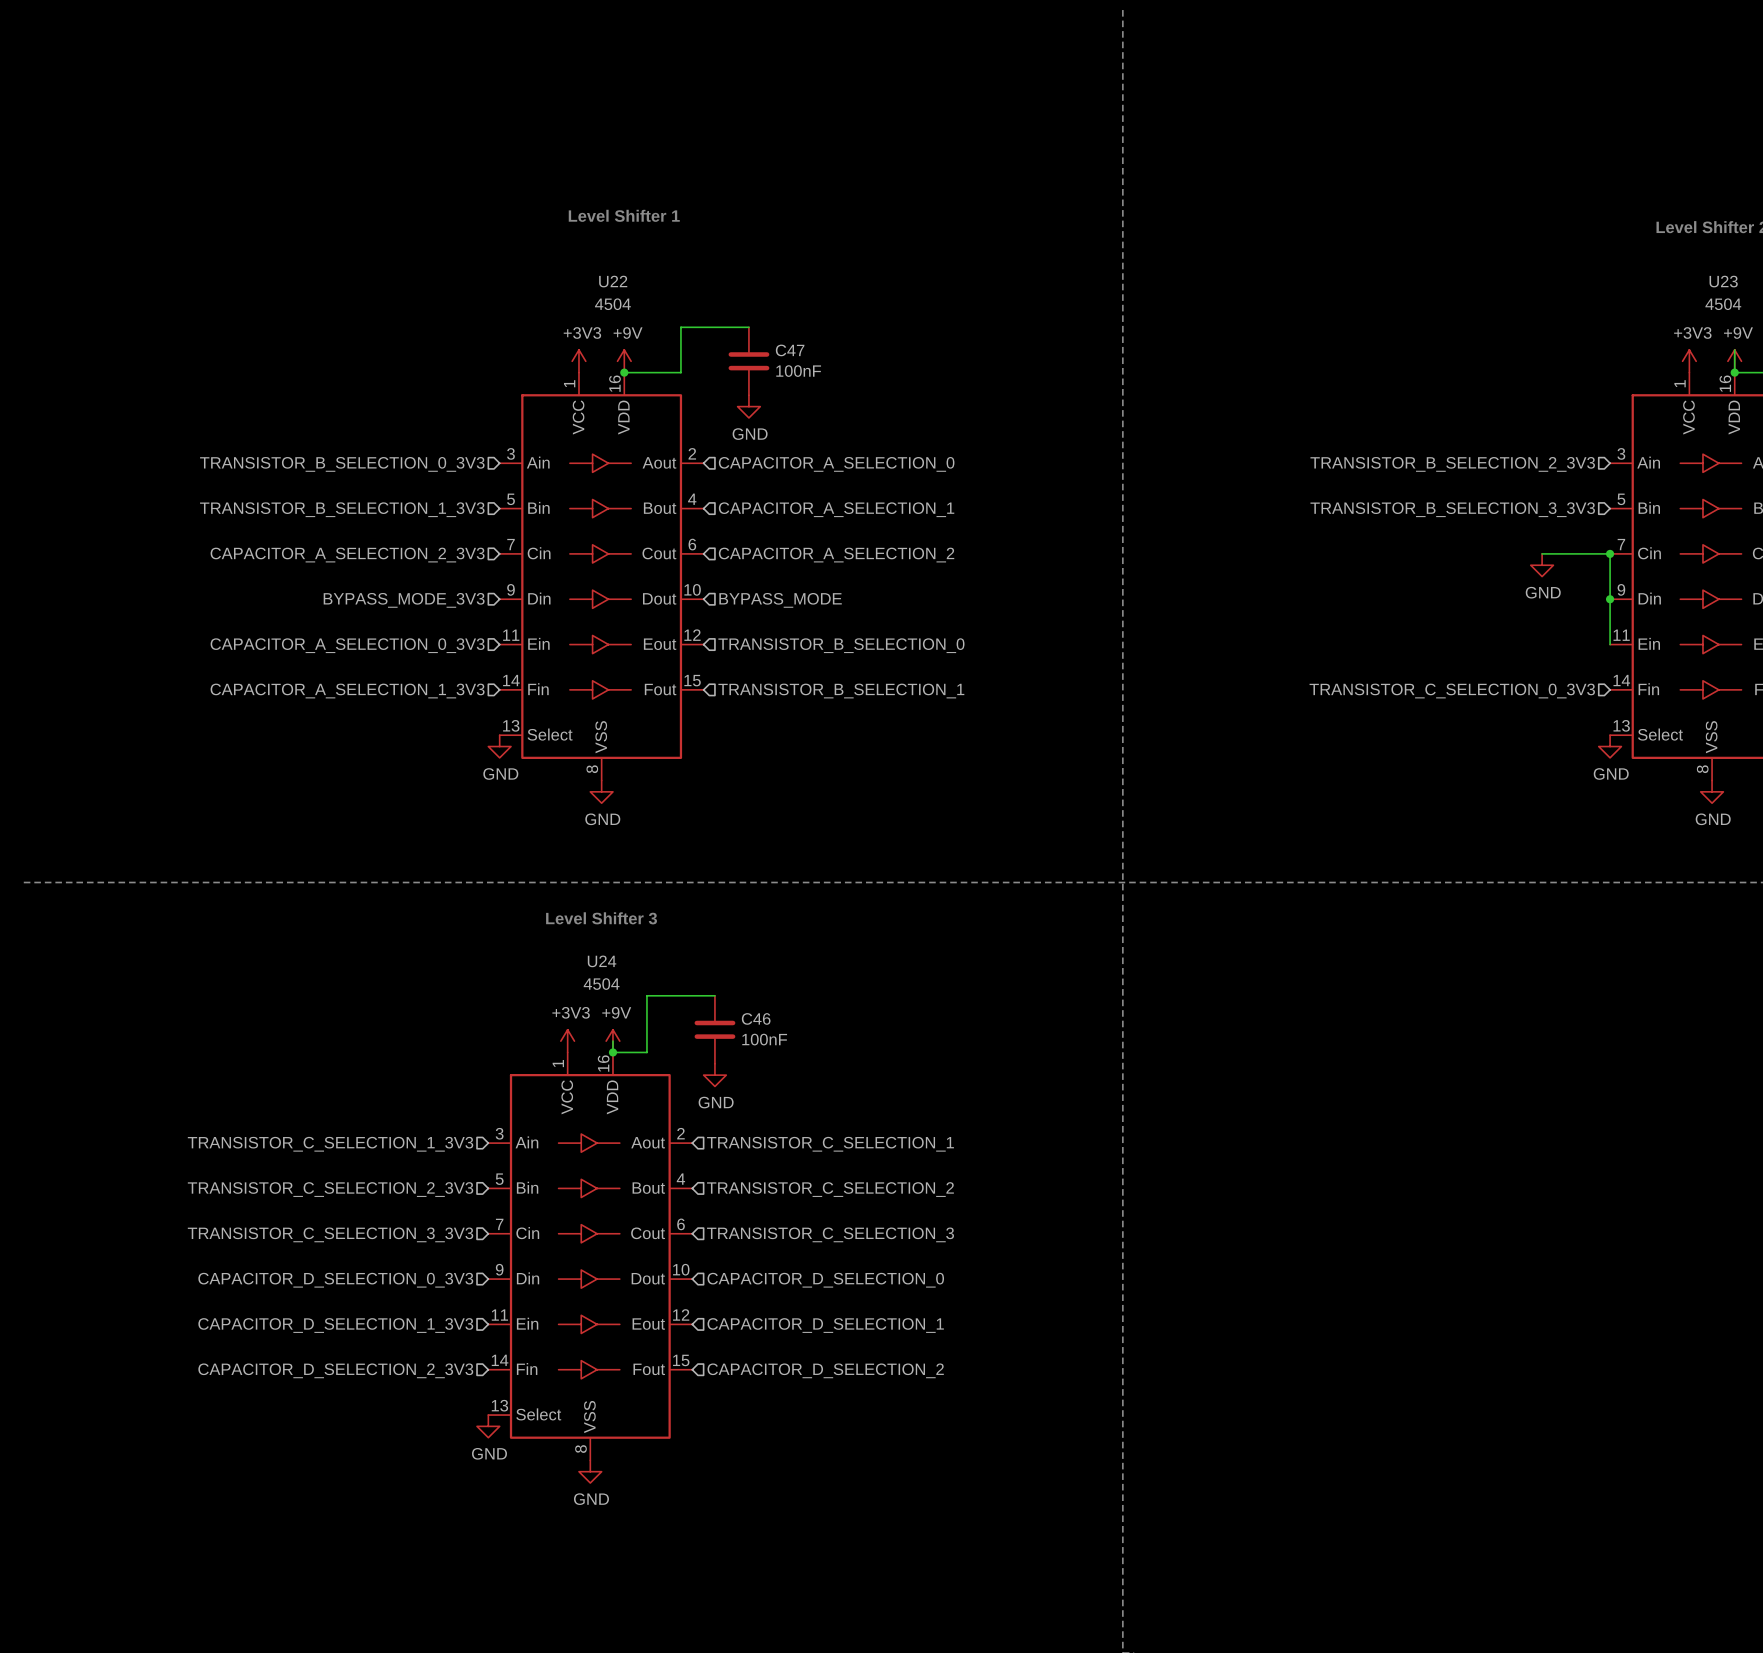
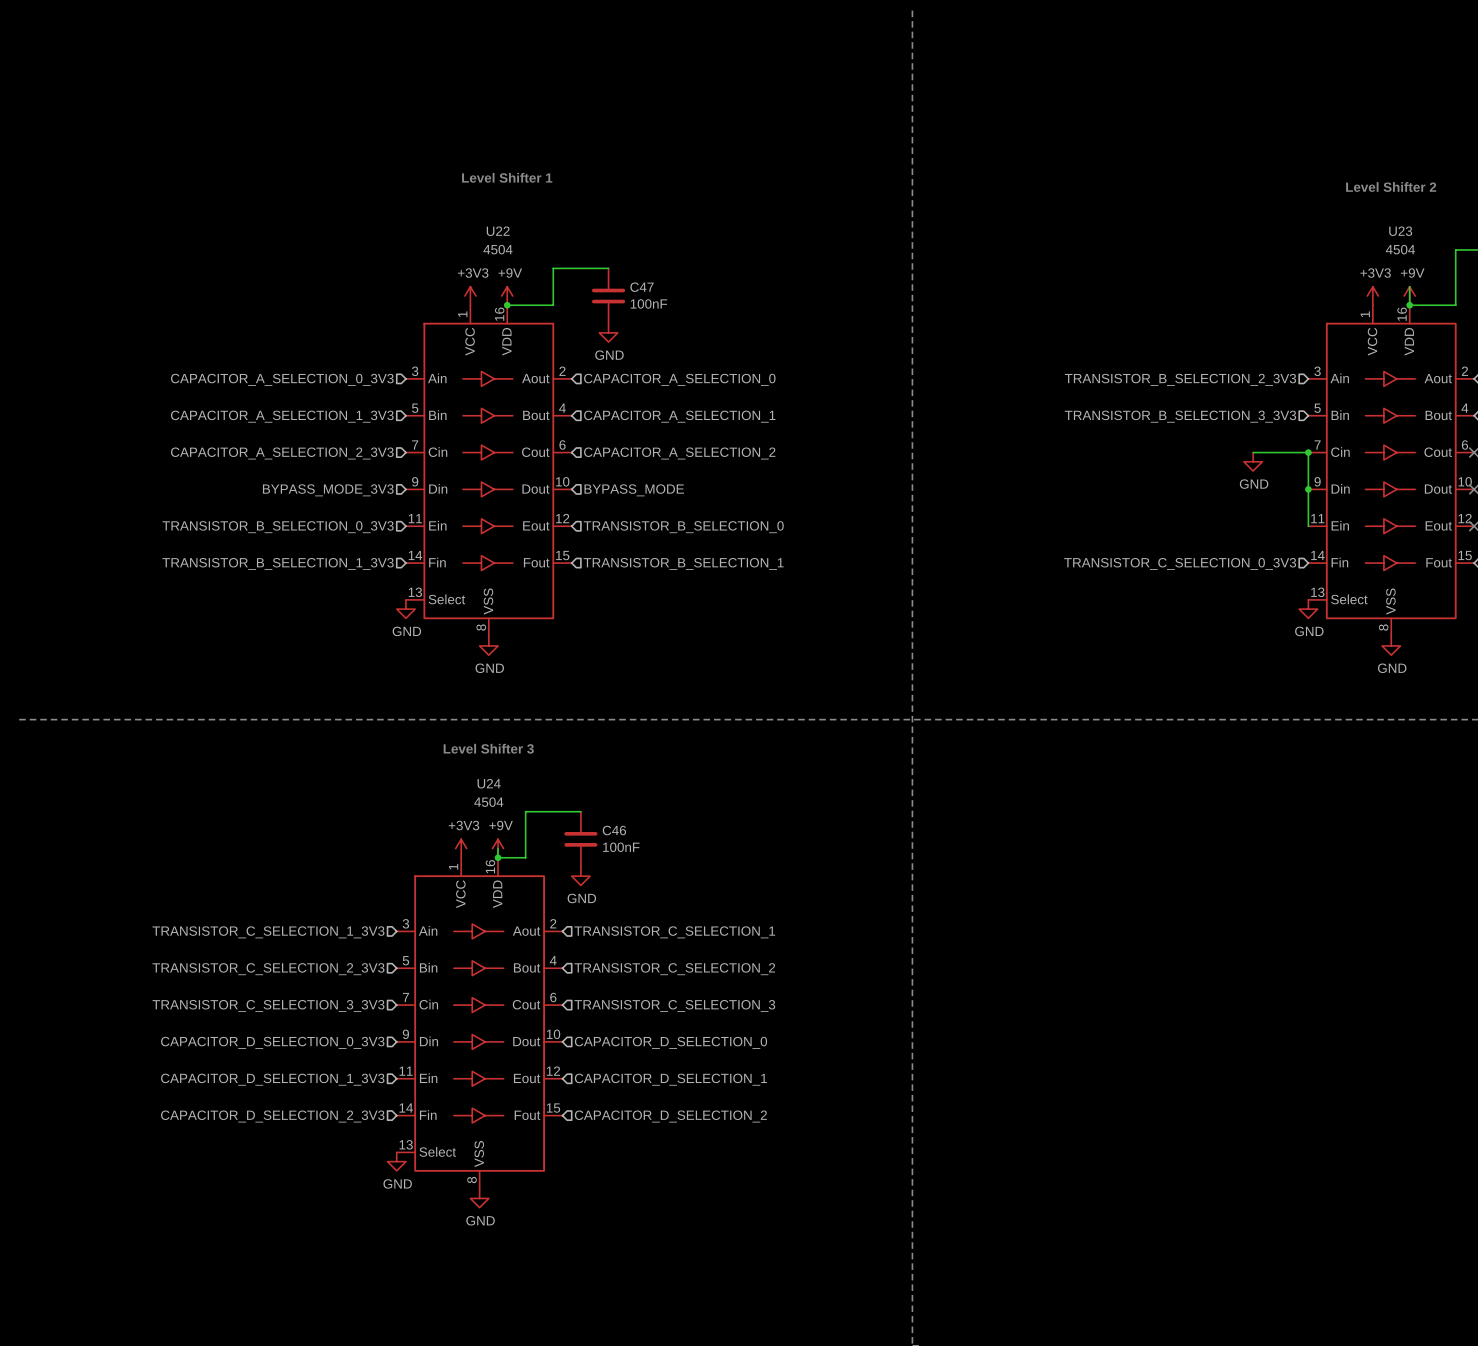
hierarchical label: TRANSISTOR_B_SELECTION_0_3V3 (342, 464) -> CAPACITOR_A_SELECTION_0_3V3 (282, 379)
hierarchical label: TRANSISTOR_B_SELECTION_1_3V3 (342, 509) -> CAPACITOR_A_SELECTION_1_3V3 (282, 416)
hierarchical label: CAPACITOR_A_SELECTION_0_3V3 (347, 645) -> TRANSISTOR_B_SELECTION_0_3V3 (278, 527)
hierarchical label: CAPACITOR_A_SELECTION_1_3V3 (347, 691) -> TRANSISTOR_B_SELECTION_1_3V3 (278, 563)

